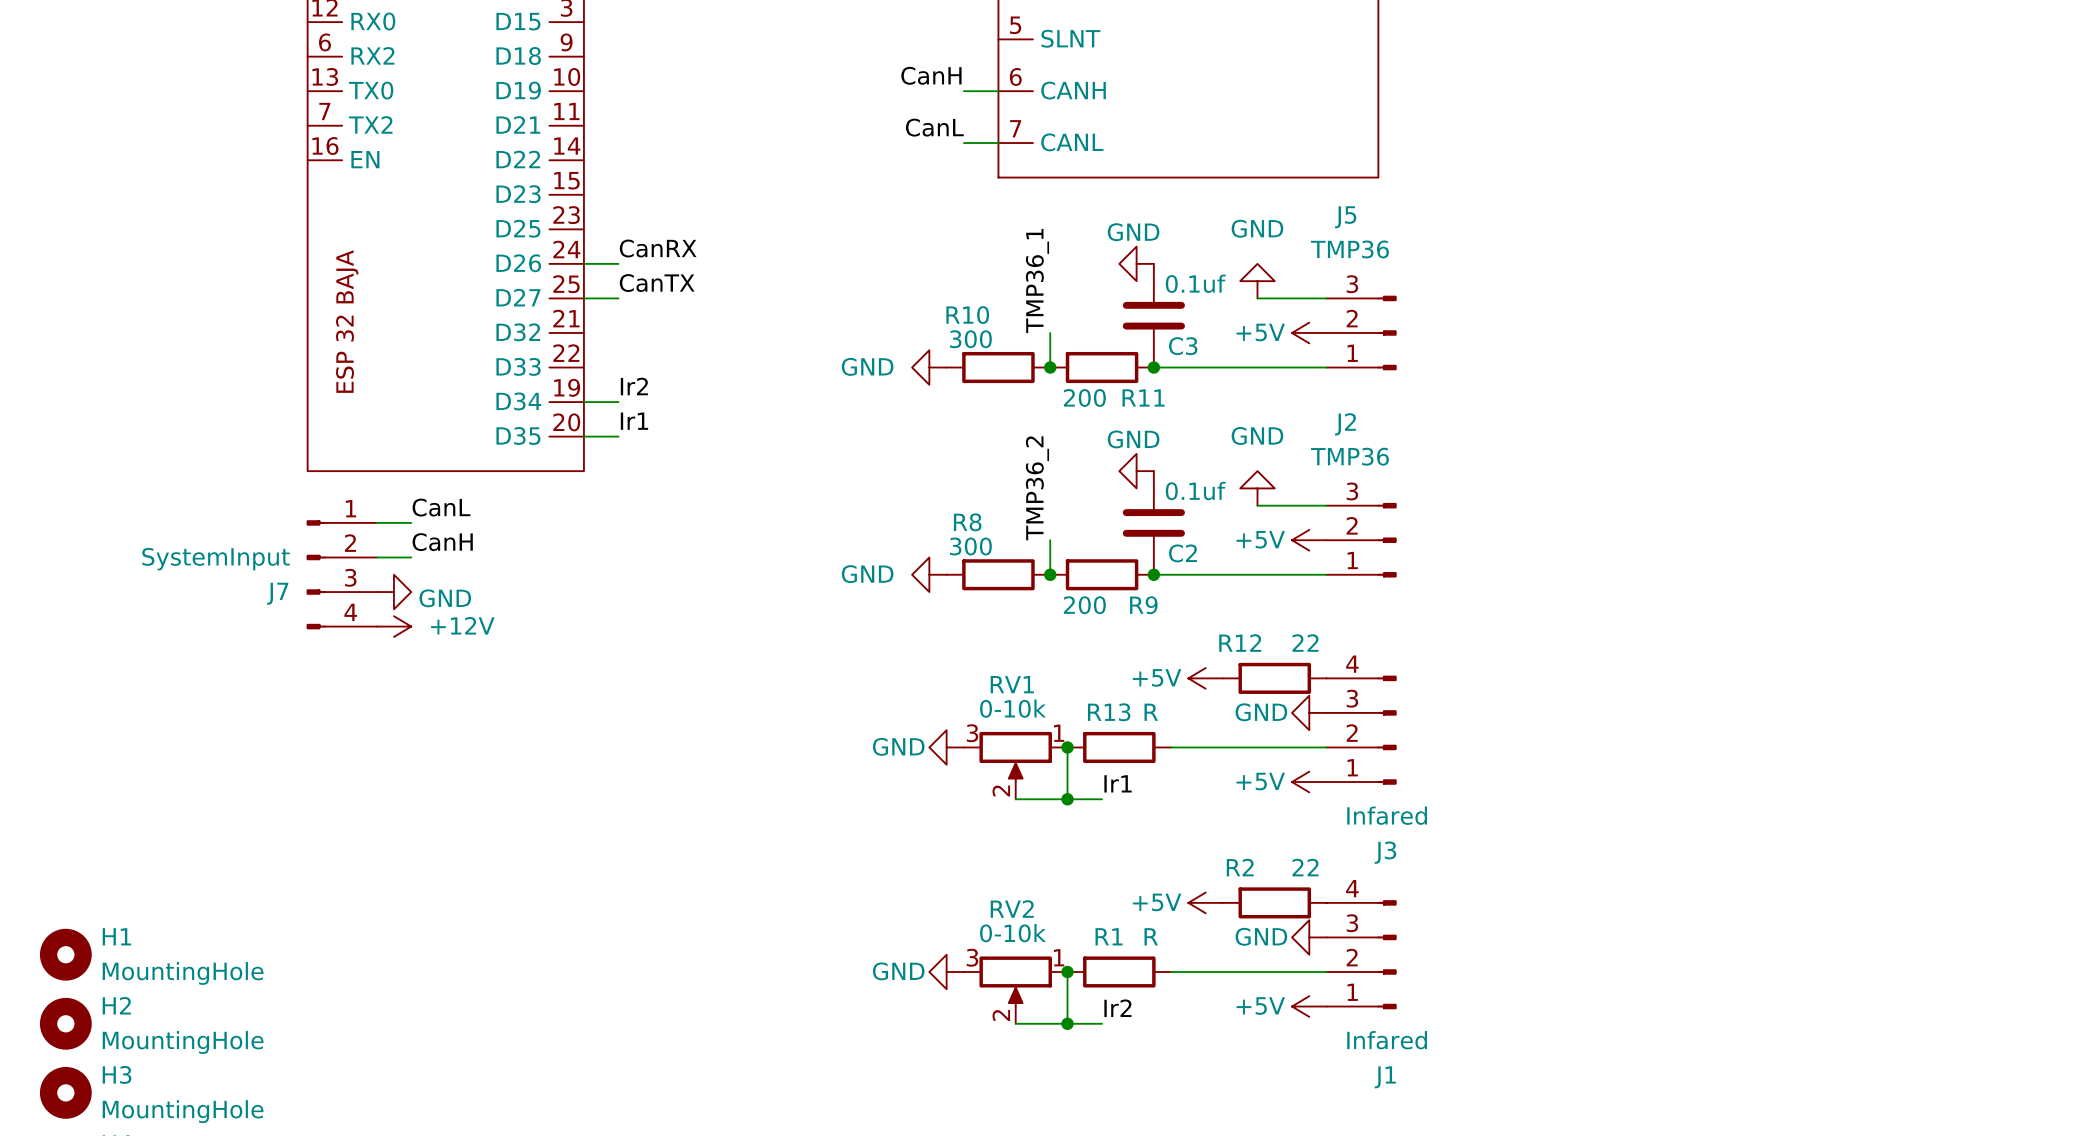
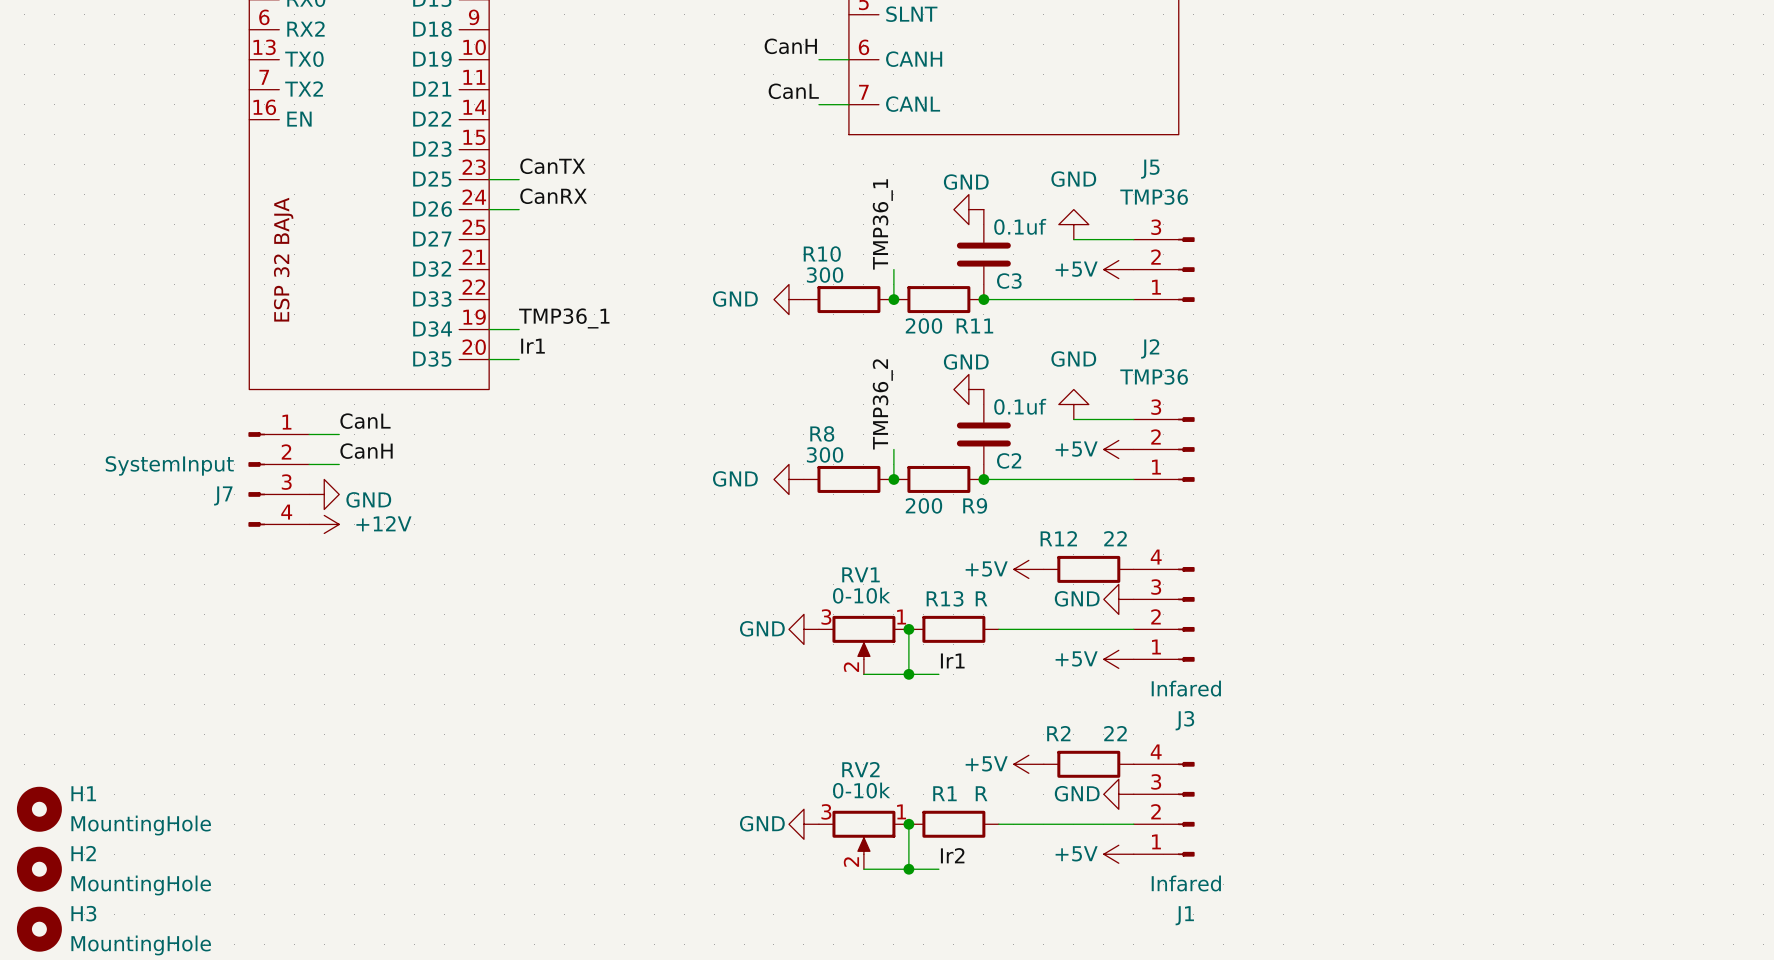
label position: CanTX (657, 283) -> CanTX (552, 166)
wire: (583, 298) (618, 298) -> (489, 179) (519, 179)
label: Ir2 (634, 386) -> TMP36_1 (564, 318)

